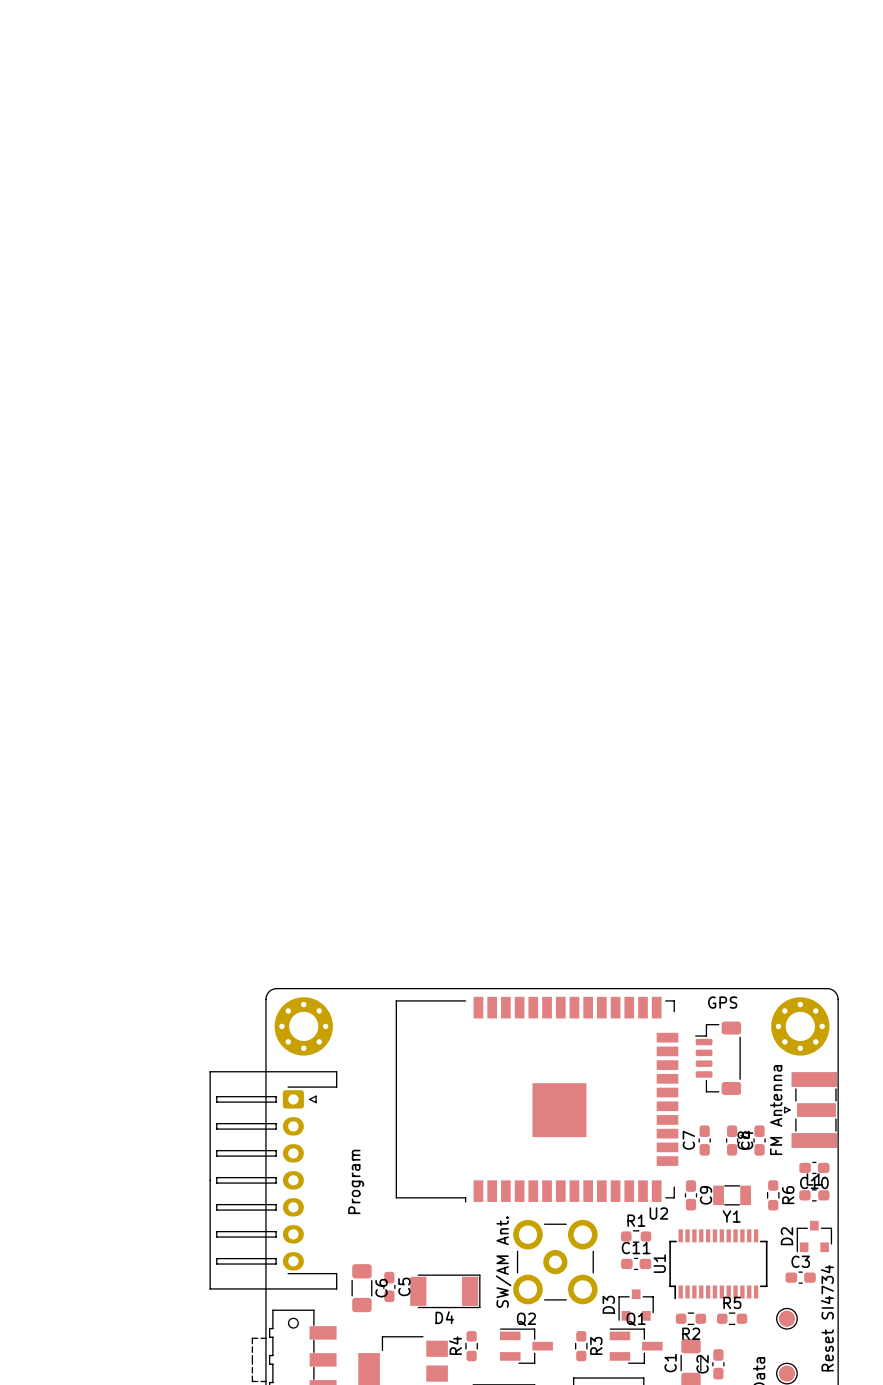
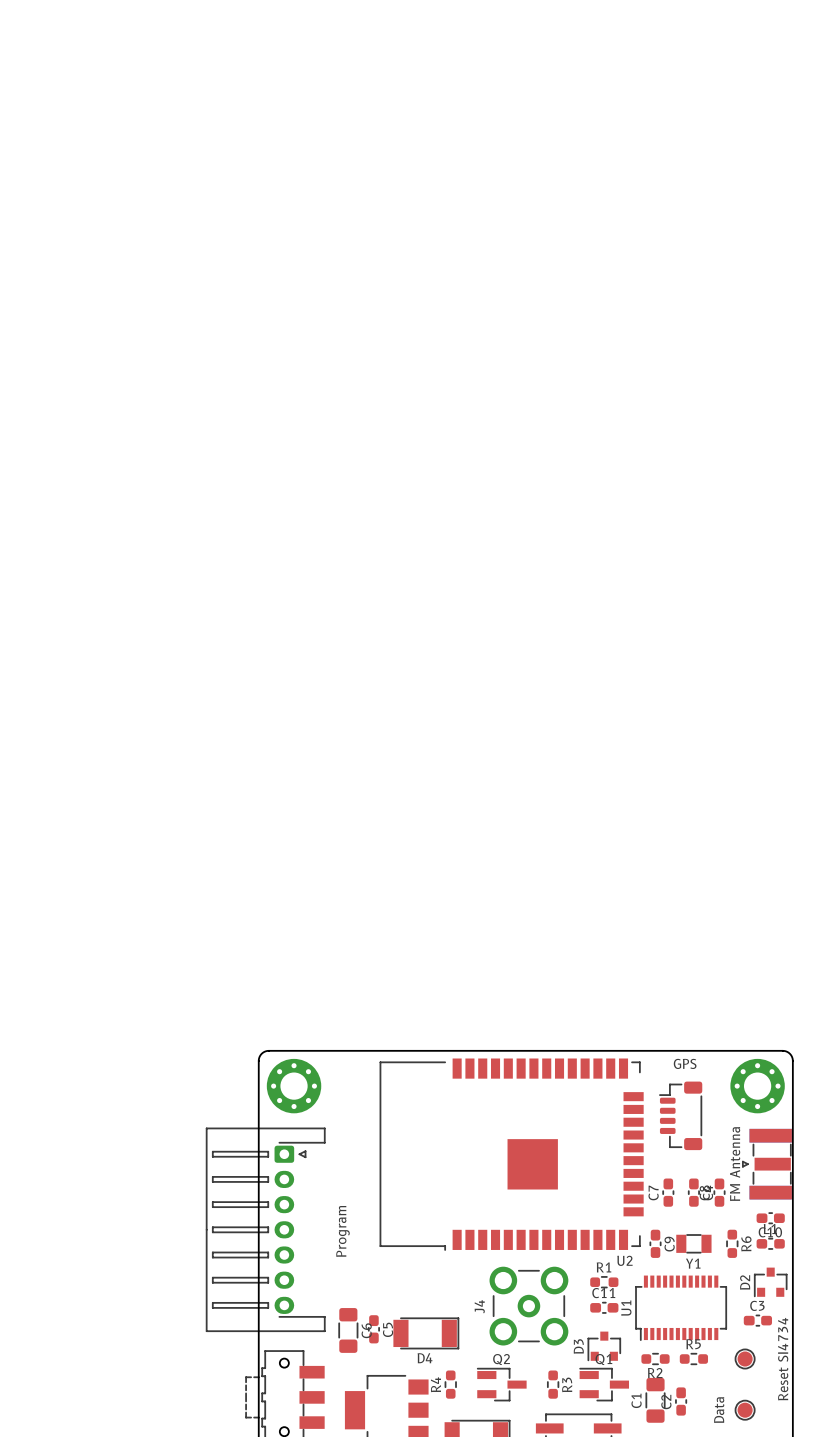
SW/AM Ant. name: SW/AM Ant. (503, 1262) -> J4 (479, 1306)

